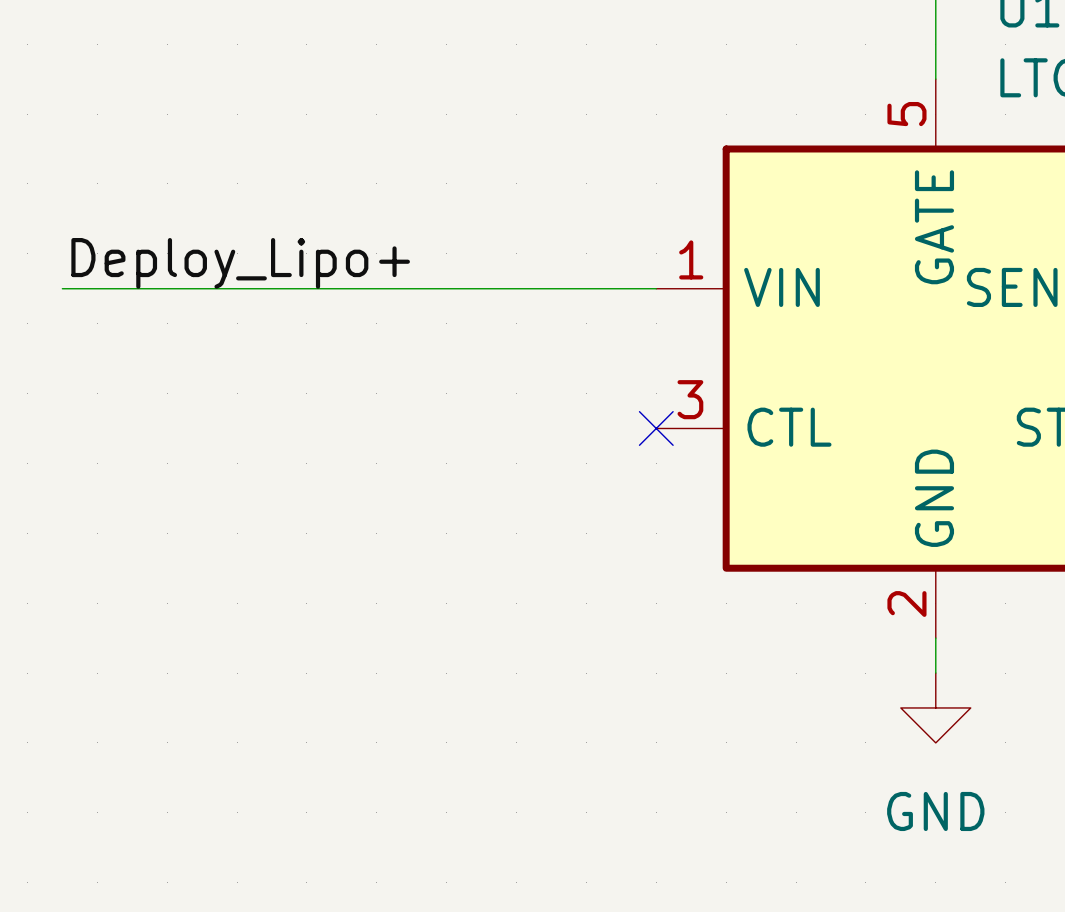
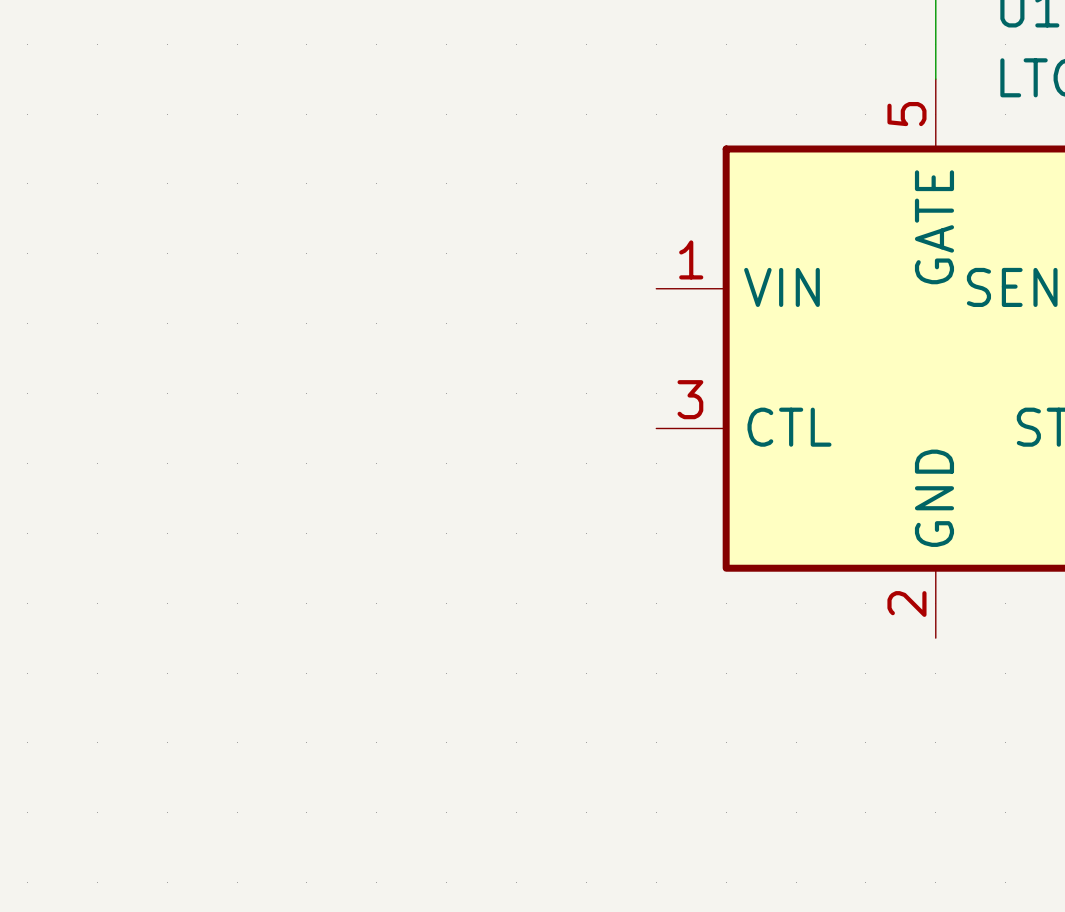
label: Deploy_Lipo+ (240, 263) -> none
wire: (62, 288) (656, 288) -> none
no-connect mark: (656, 428) -> none
wire: (935, 638) (935, 673) -> none
power symbol: GND (935, 707) -> none

